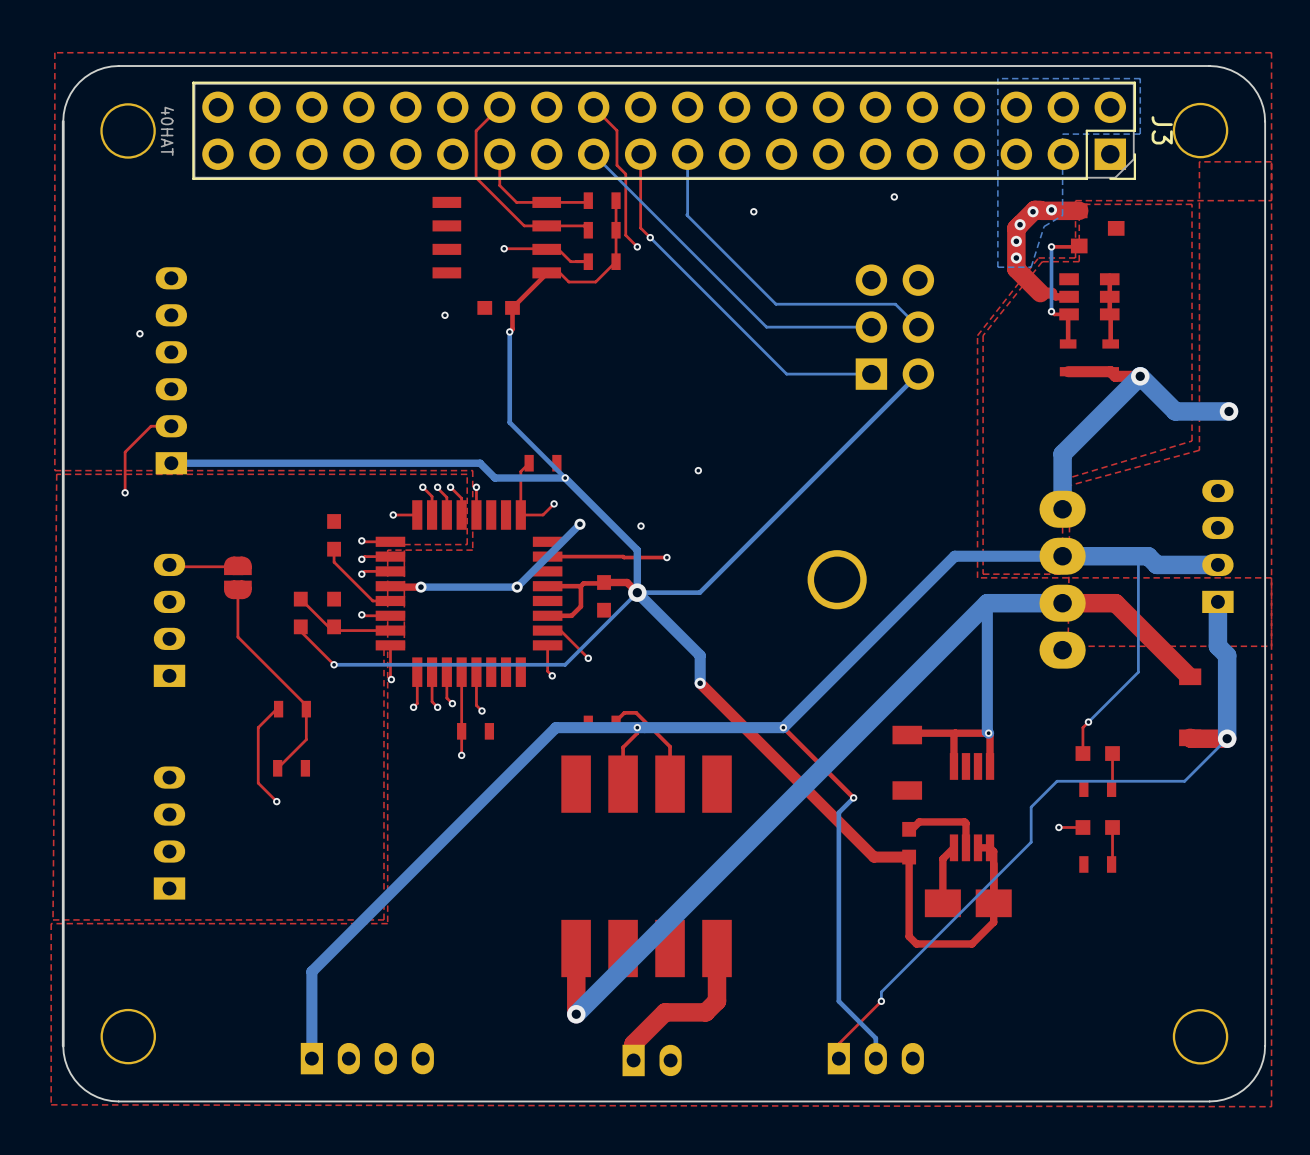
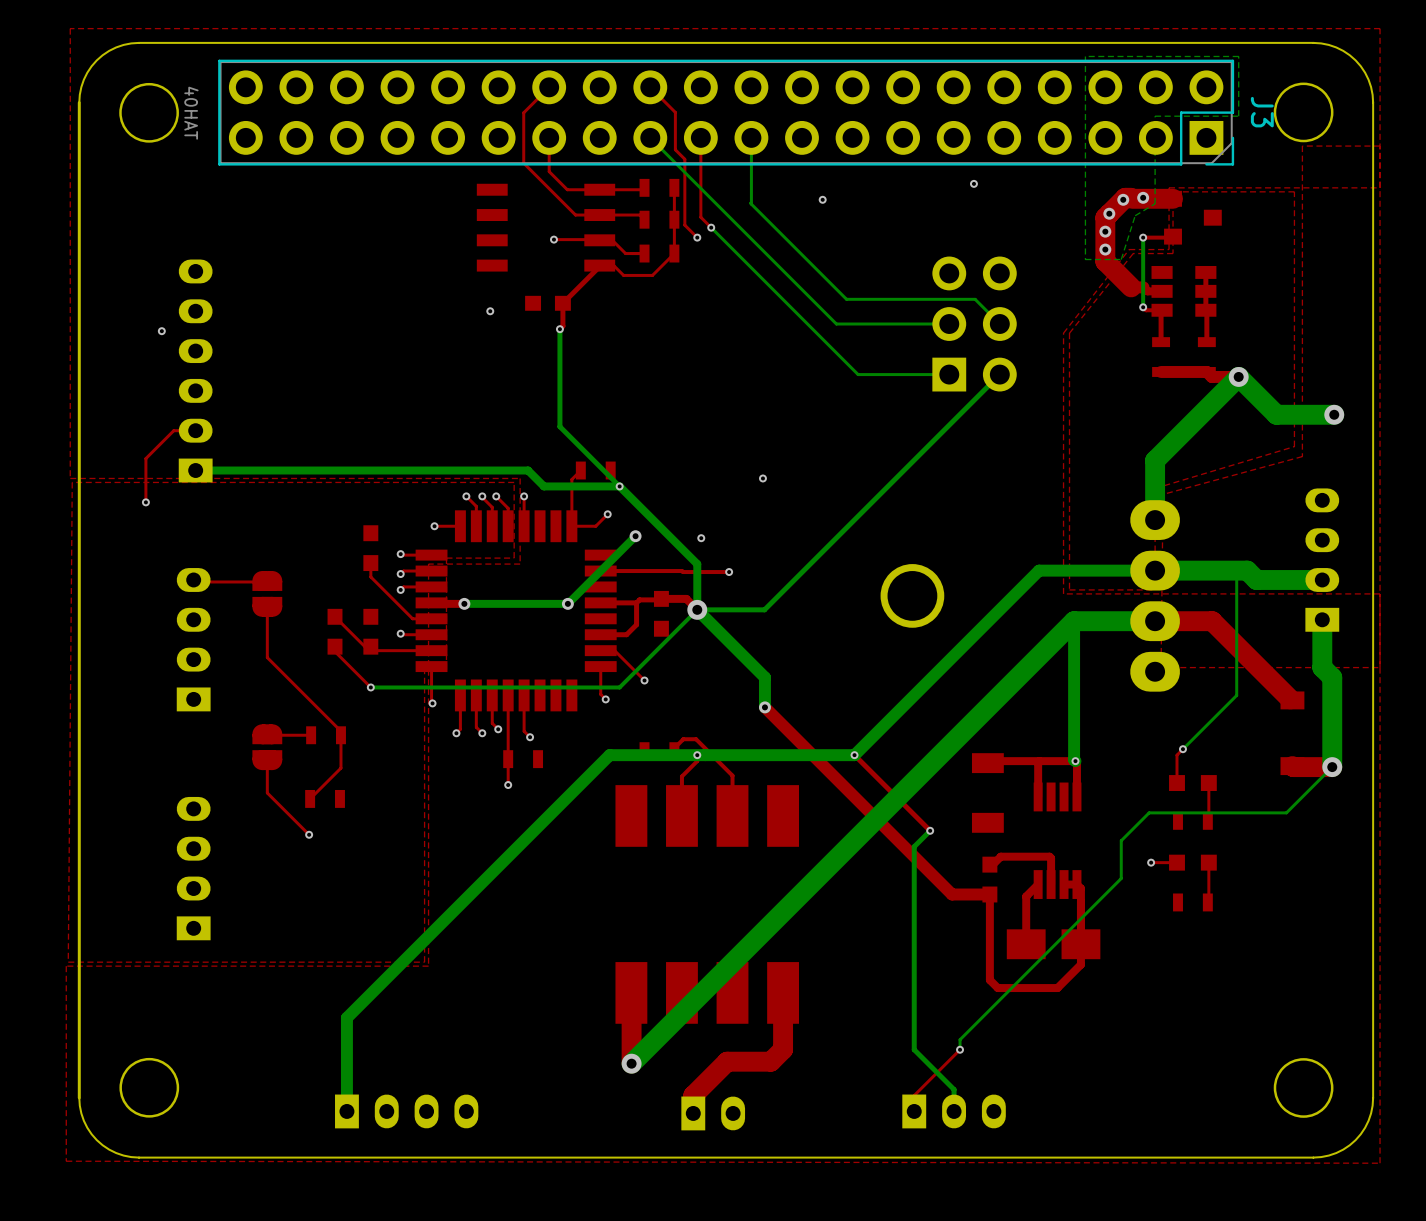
top track: none -> (267, 734) (309, 735)
top track: (276, 709) (258, 727) (258, 783) -> (267, 760) (267, 792) (289, 814)
part: none -> (267, 747)

